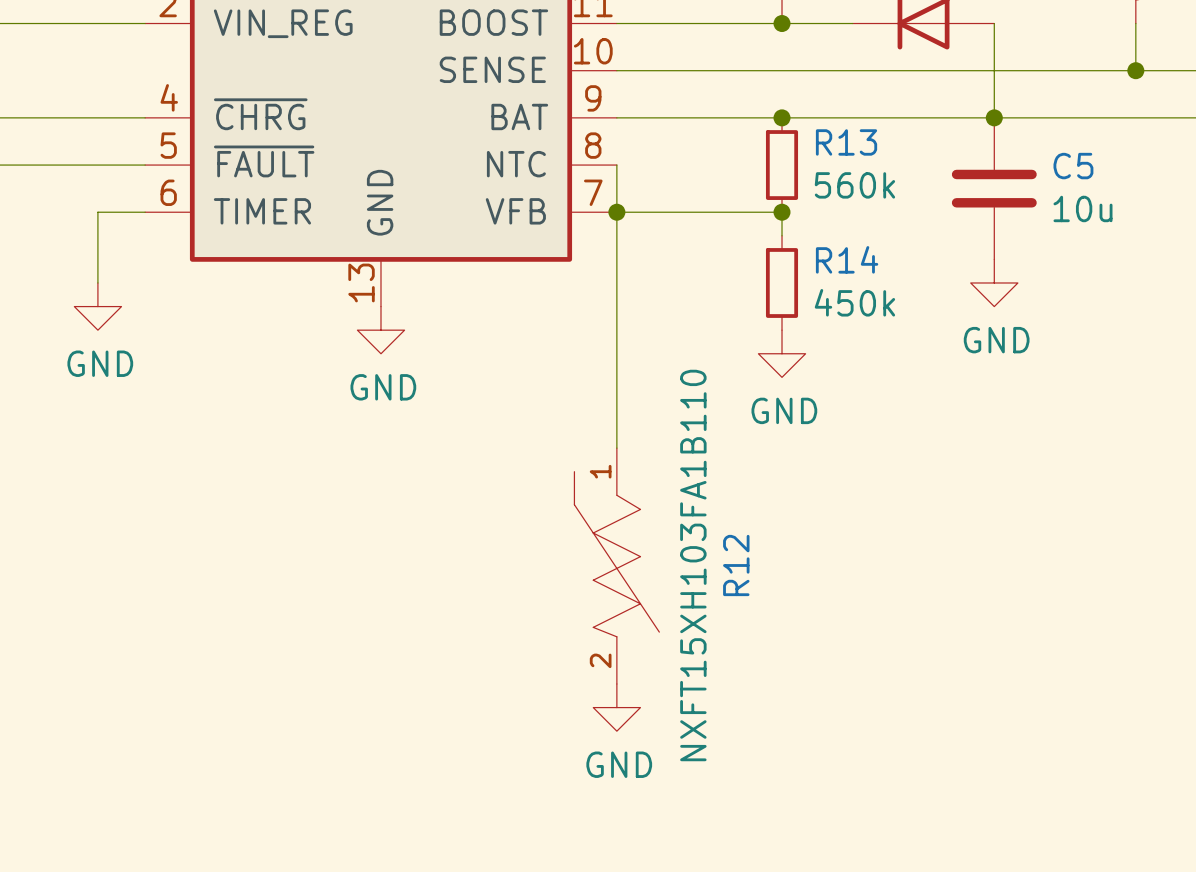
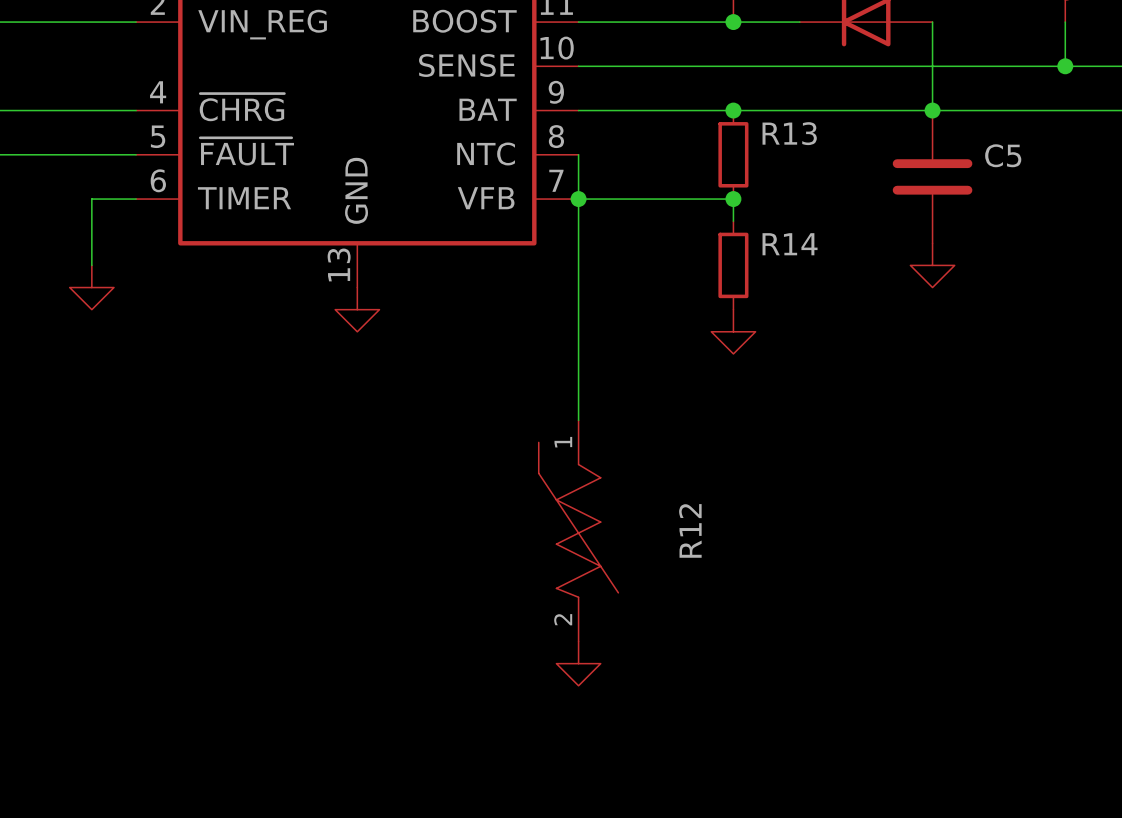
R13 value: 560k (854, 185) -> none
C5 value: 10u (1082, 208) -> none
R14 value: 450k (854, 302) -> none
power symbol text: GND (996, 340) -> none
power symbol text: GND (100, 363) -> none
power symbol text: GND (383, 387) -> none
power symbol text: GND (784, 410) -> none
R12 value: NXFT15XH103FA1B110 (693, 565) -> none
power symbol text: GND (619, 764) -> none

